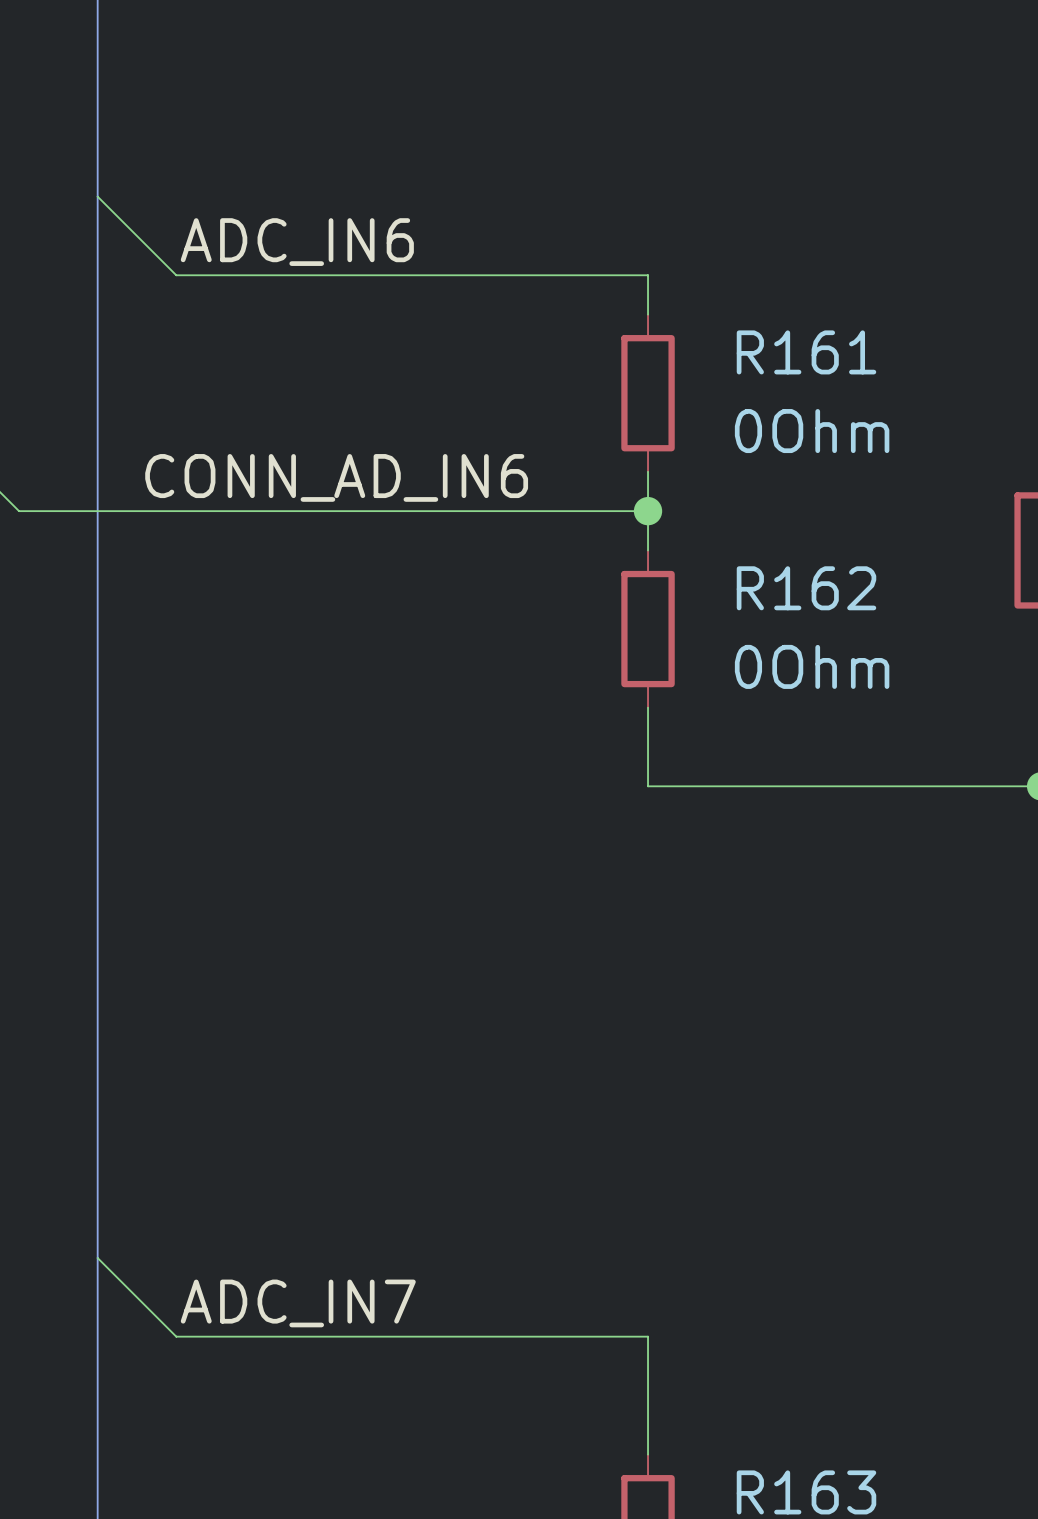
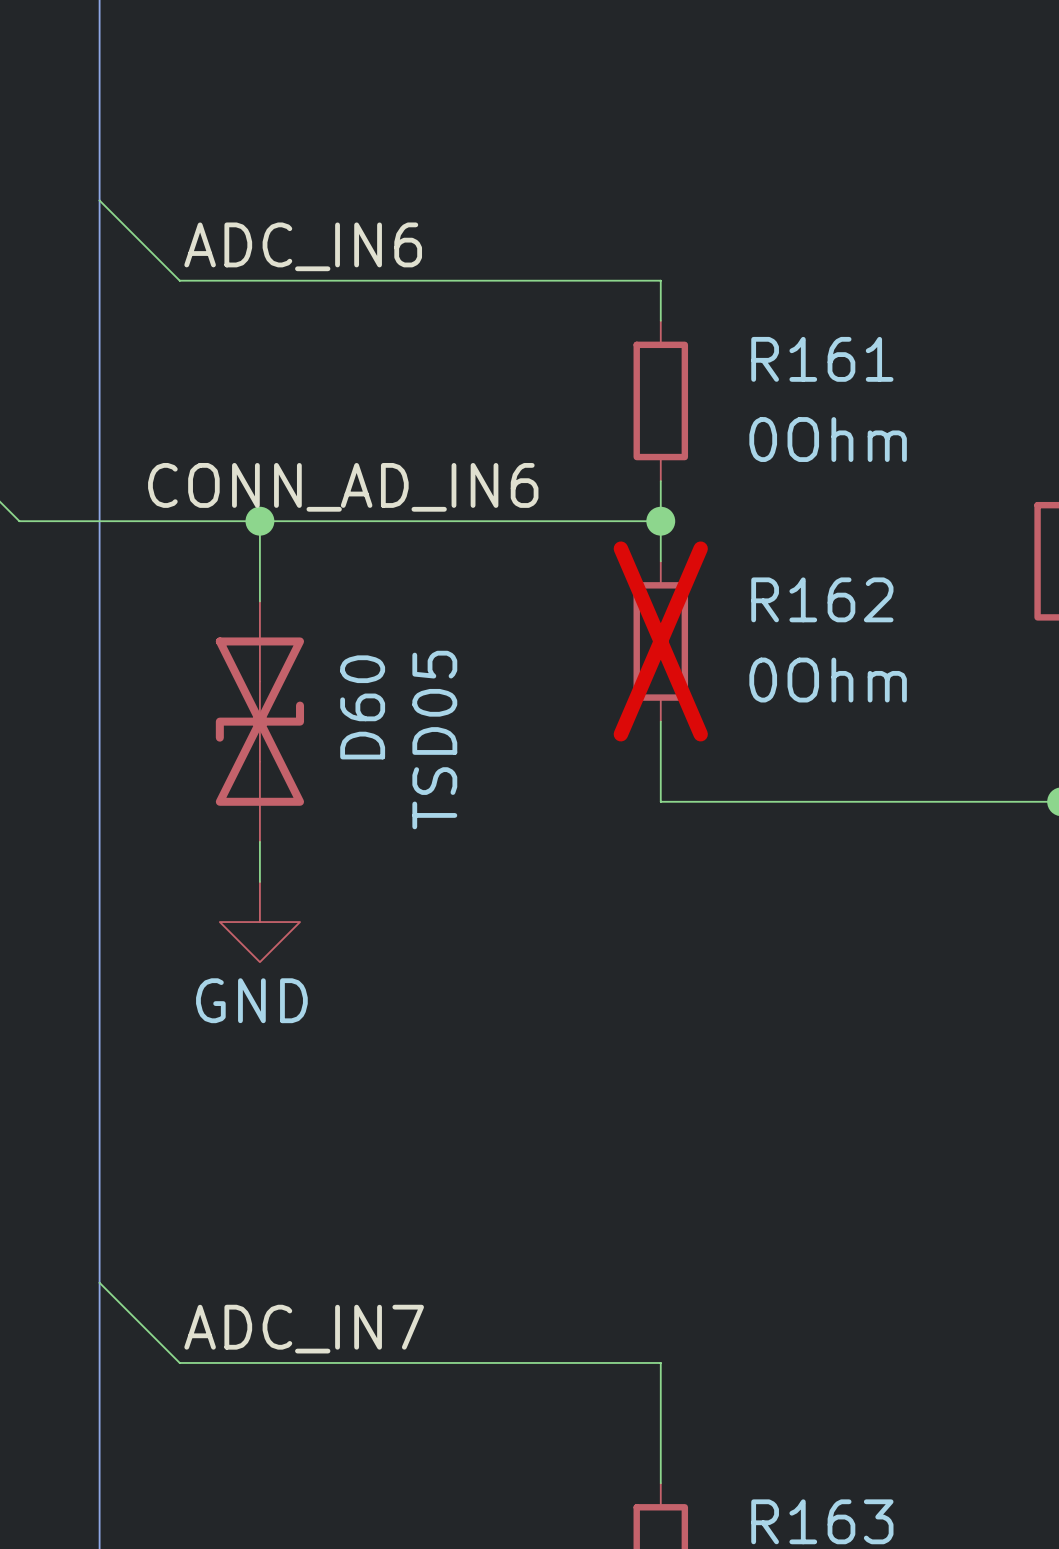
wire: none -> (259, 521) (259, 601)
junction: none -> (259, 521)
R162 do-not-place cross: none -> (660, 641)
D60: none -> TSD05 (259, 721)
wire: none -> (259, 841) (259, 881)
power symbol: none -> GND (259, 922)

